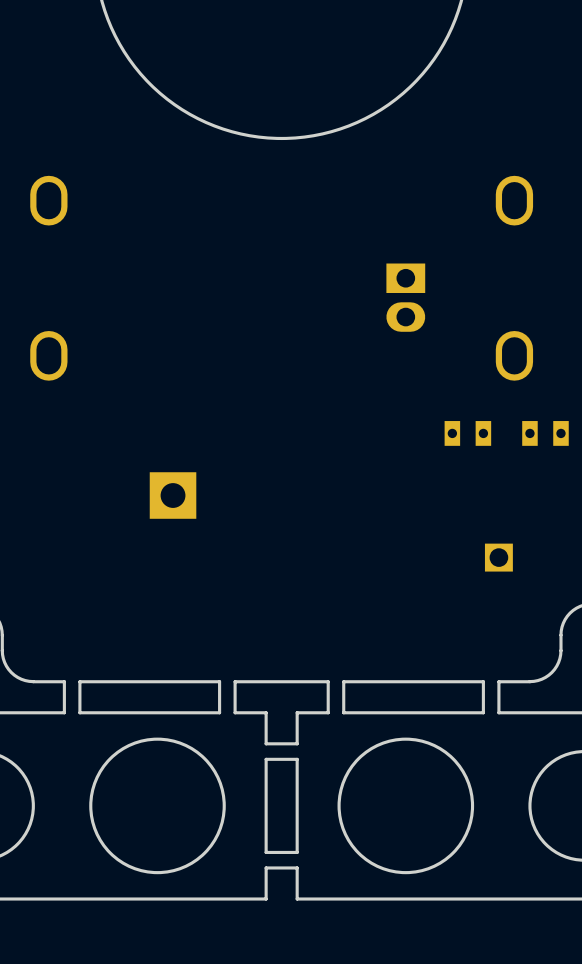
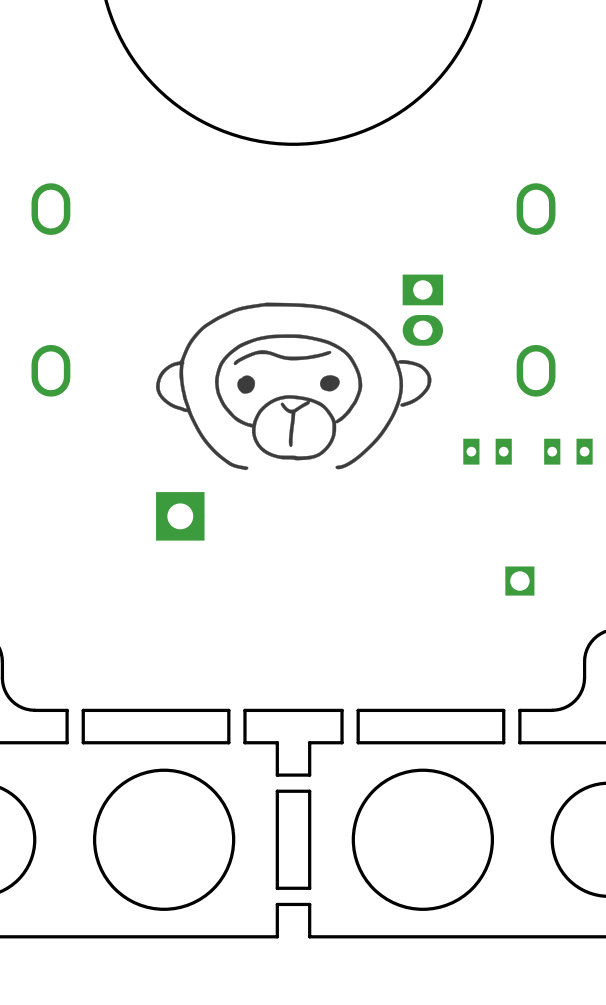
drawing: none -> [156, 302, 432, 471]

